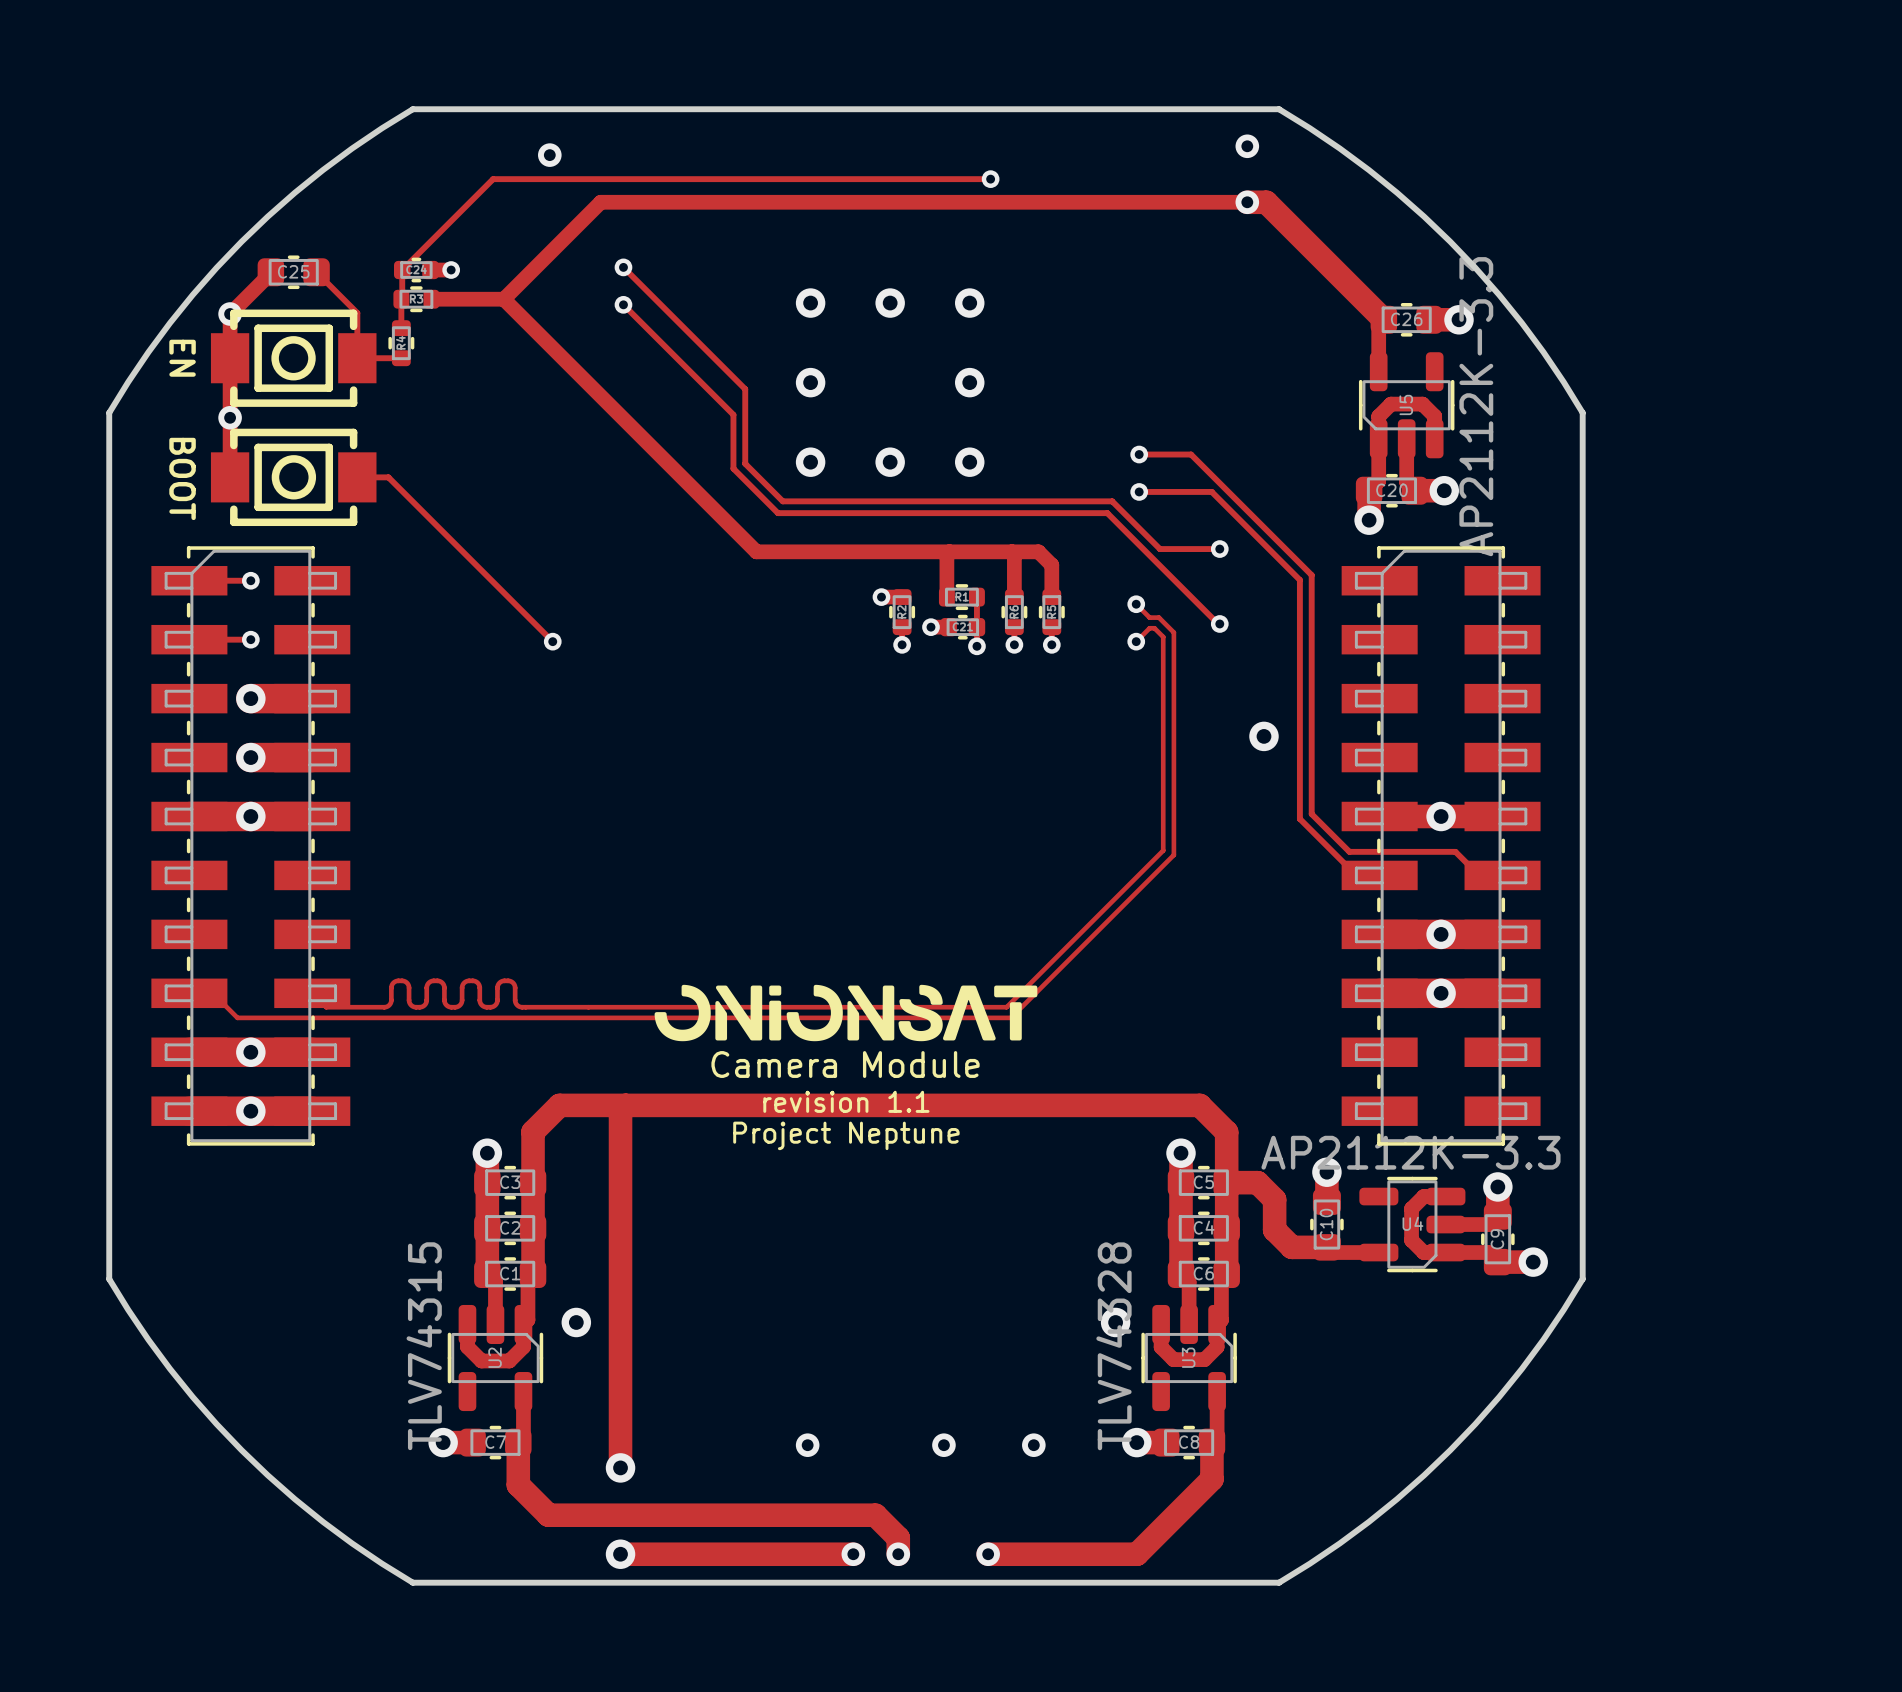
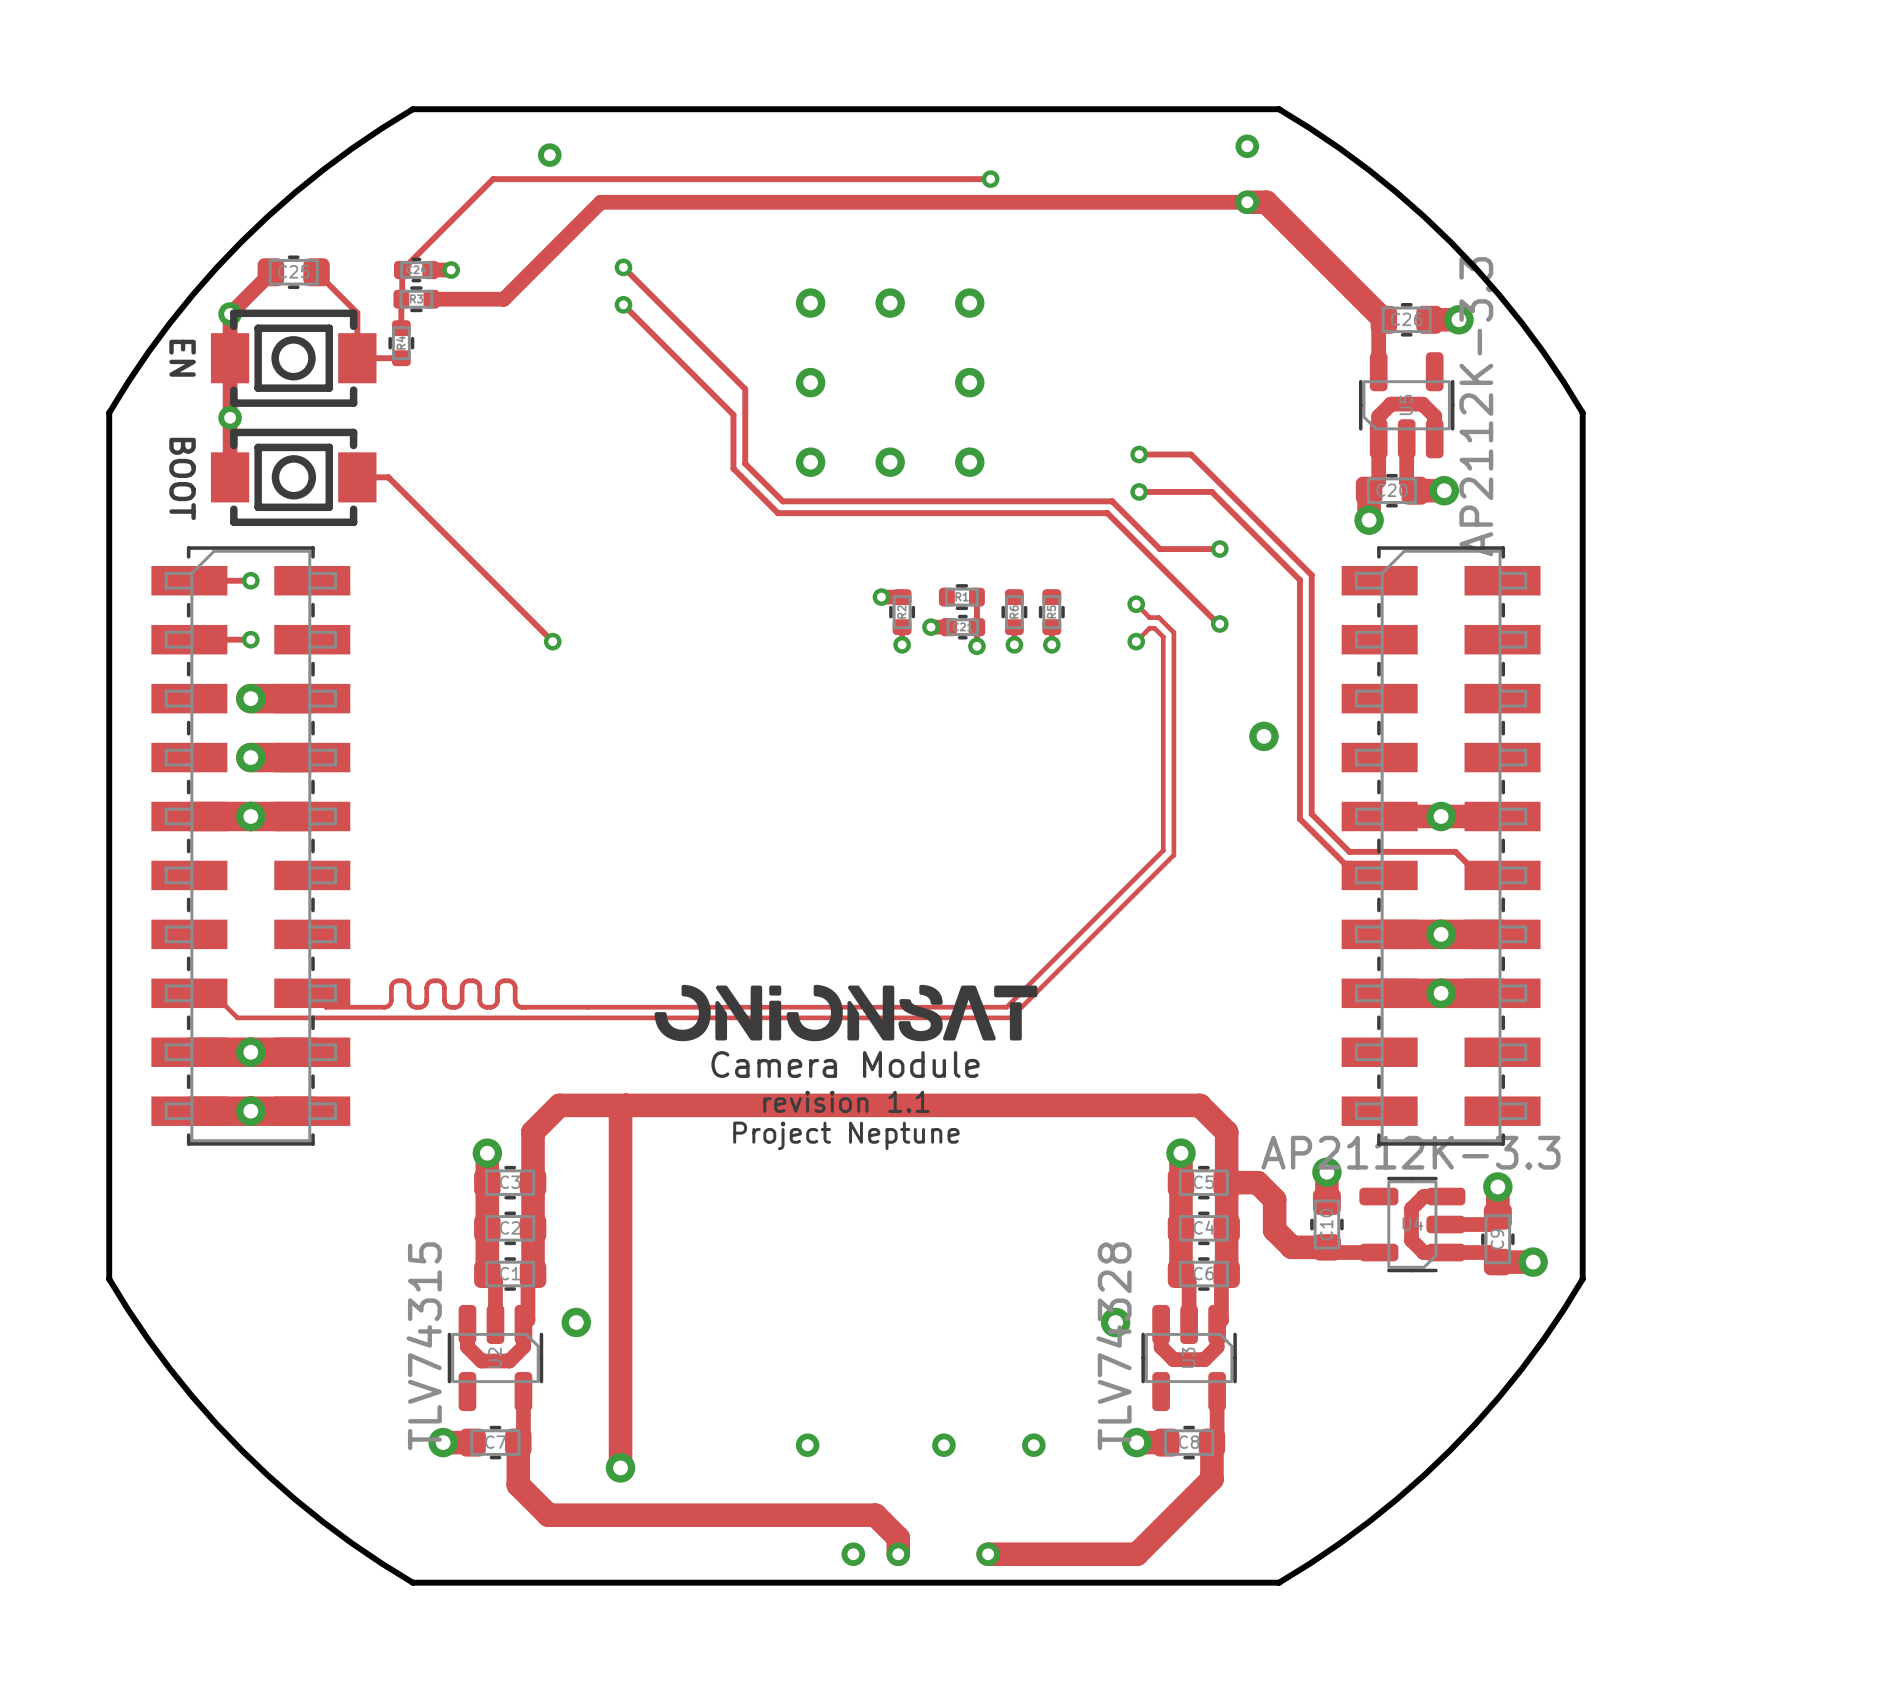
track: (503, 299) (756, 551) (1038, 551) (1051, 565) (1051, 597) -> none
track: (949, 551) (946, 554) (946, 597) -> none
track: (1012, 551) (1014, 554) (1014, 597) -> none
track: (620, 1554) (853, 1554) -> none
via: (620, 1554) -> none

